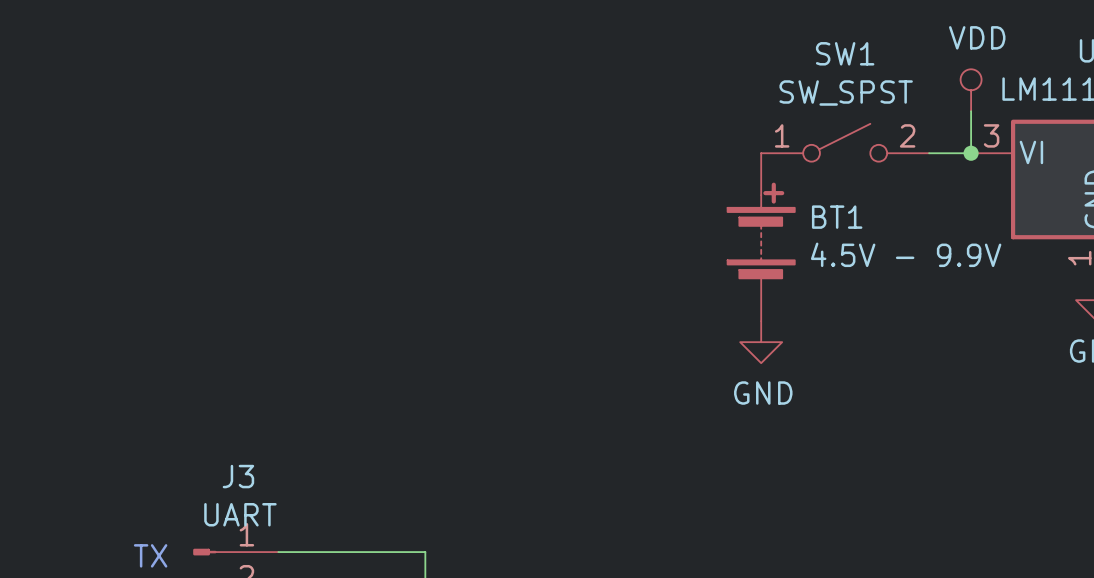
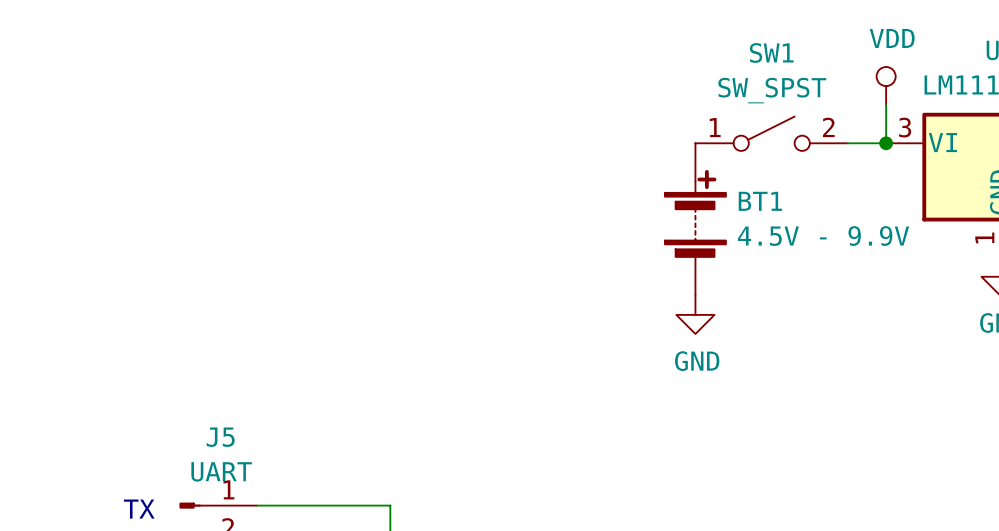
J3 name: J3 (238, 476) -> J5 (220, 437)

